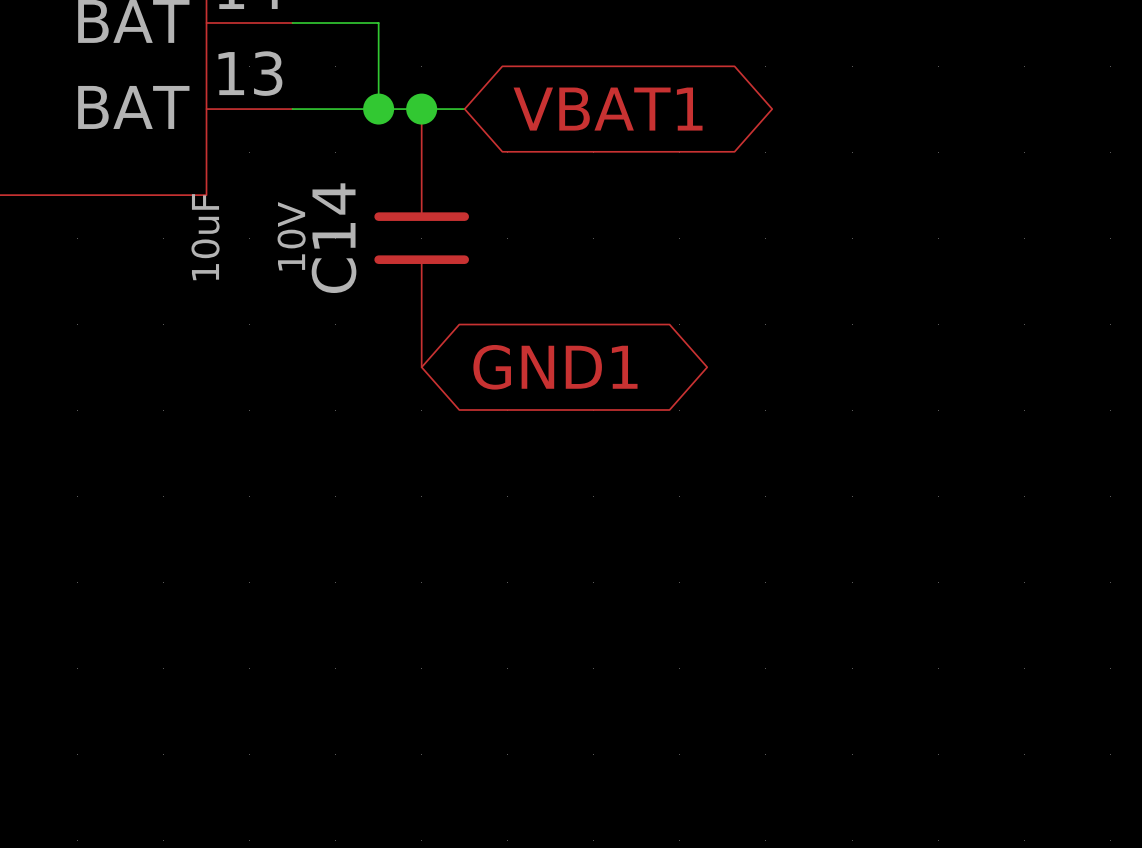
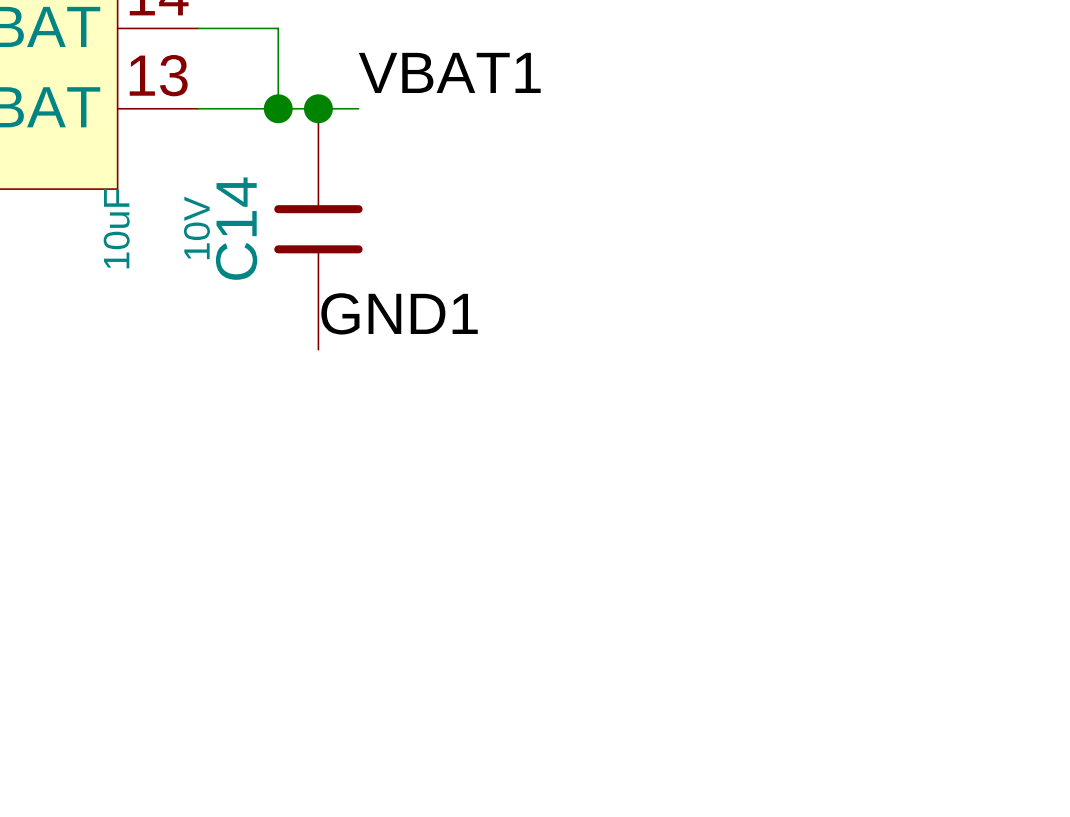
label: none -> VBAT1 (449, 72)
global label: VBAT1 (608, 109) -> none
label: none -> GND1 (399, 313)
global label: GND1 (555, 367) -> none

